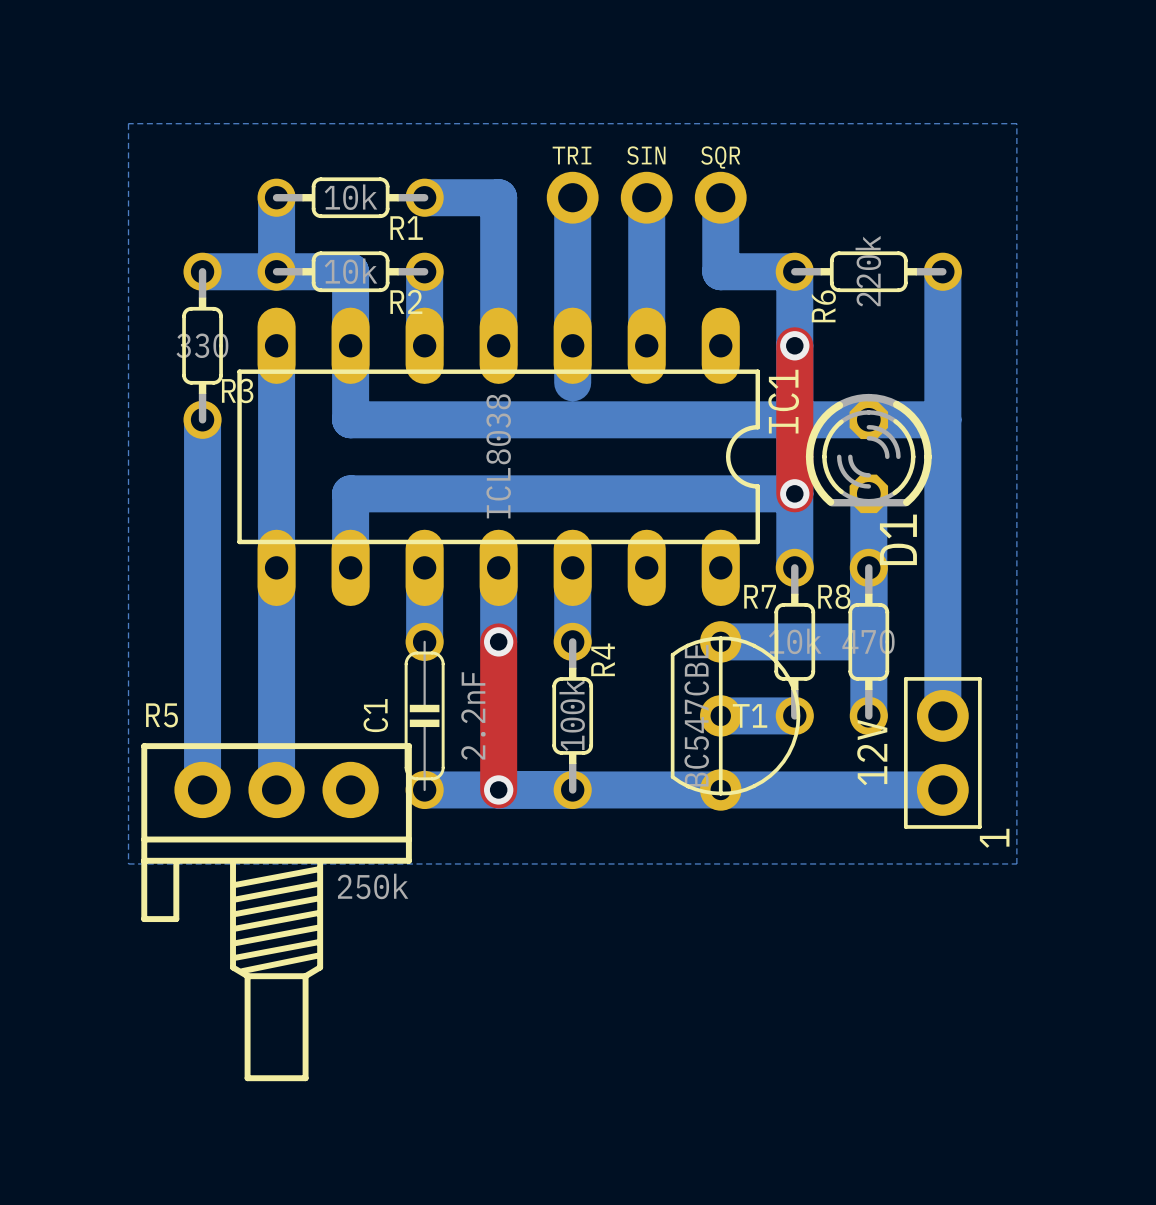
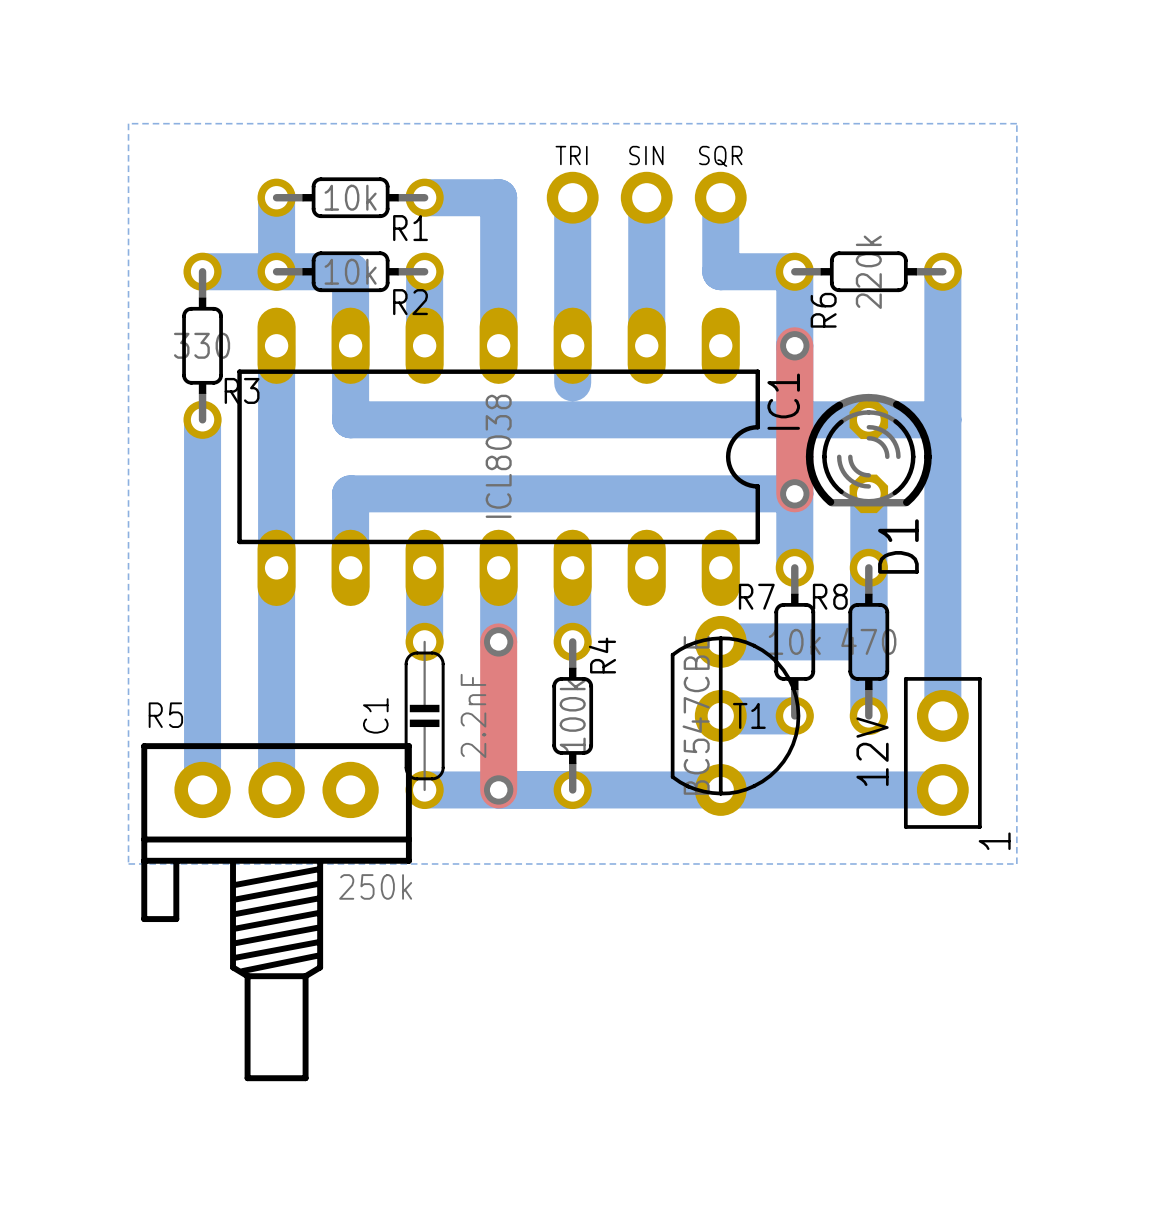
T1 footprint: [670, 621, 801, 811] -> [670, 615, 801, 816]

